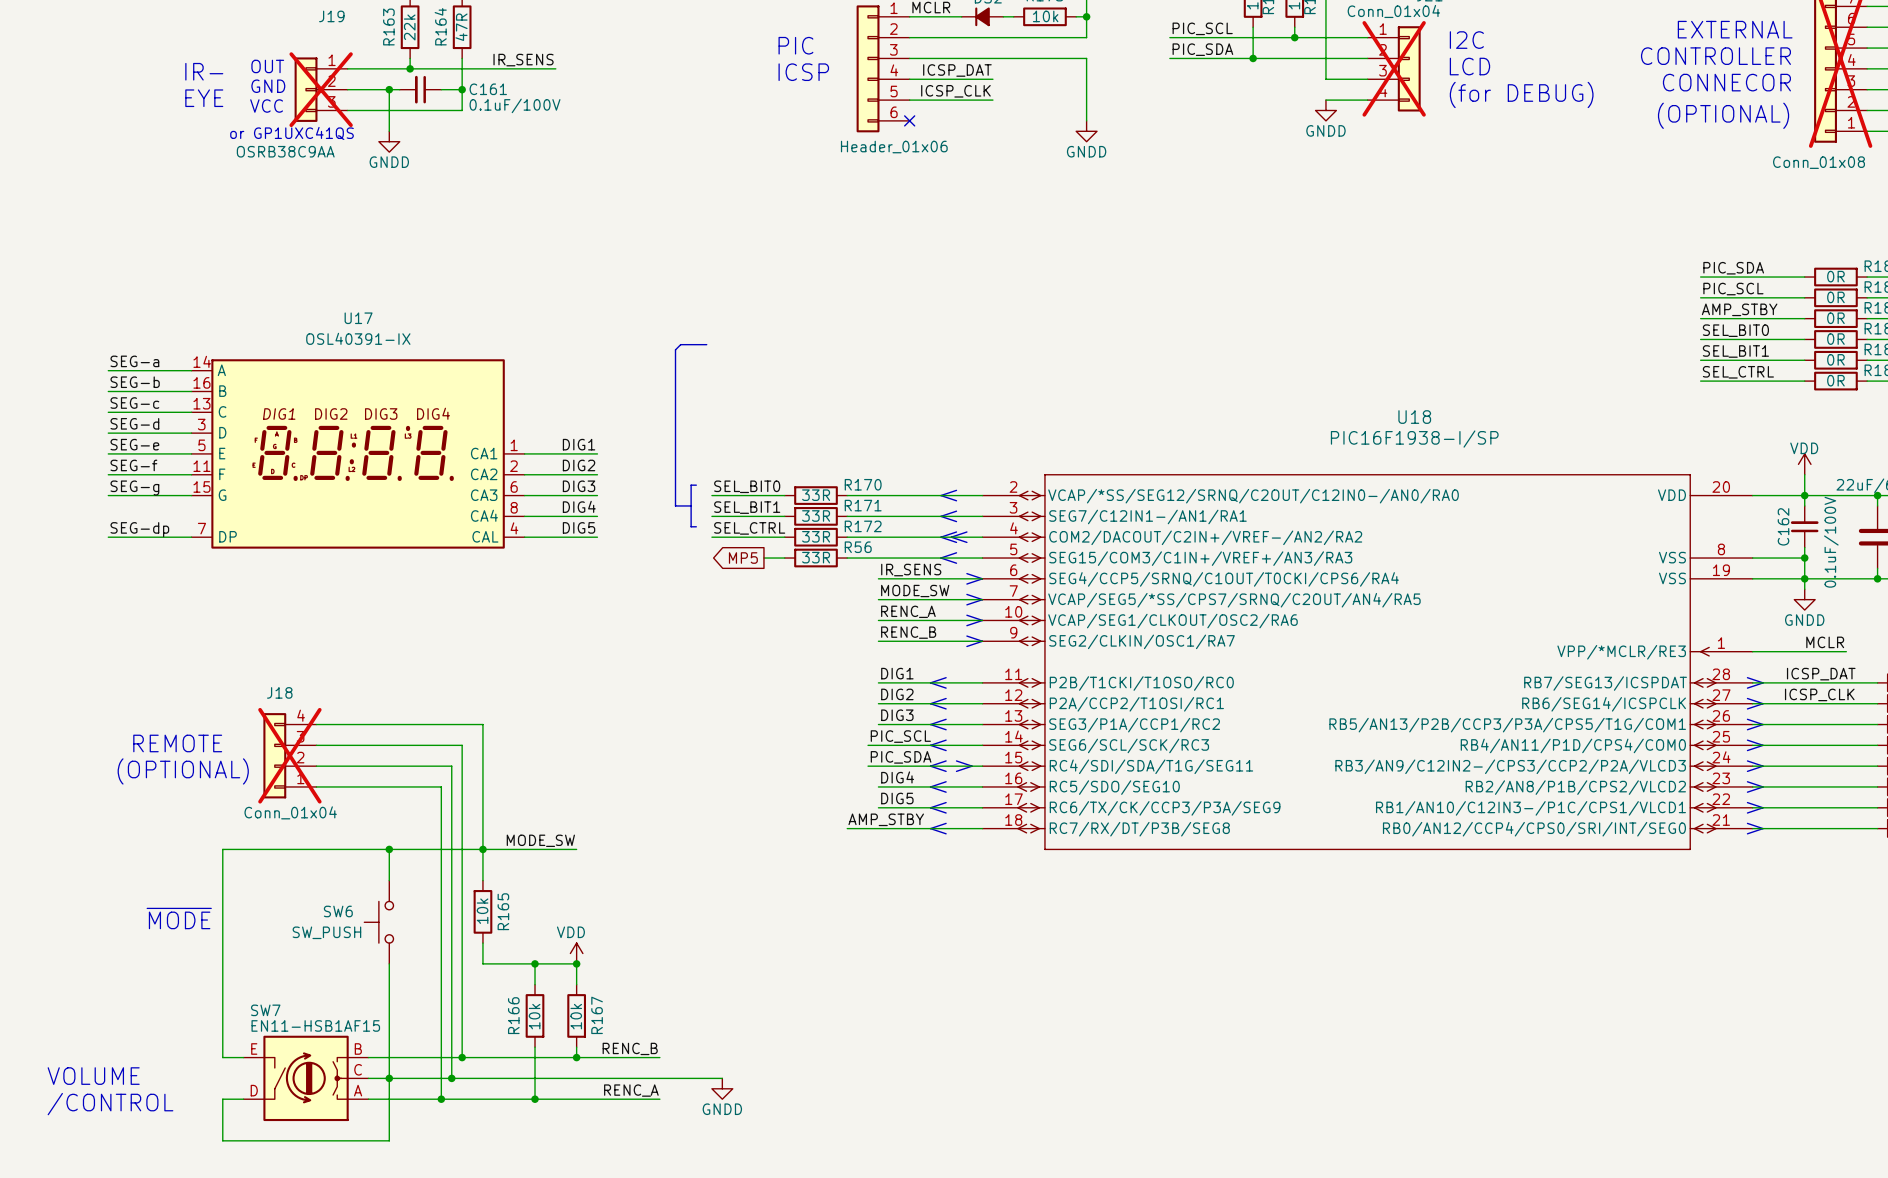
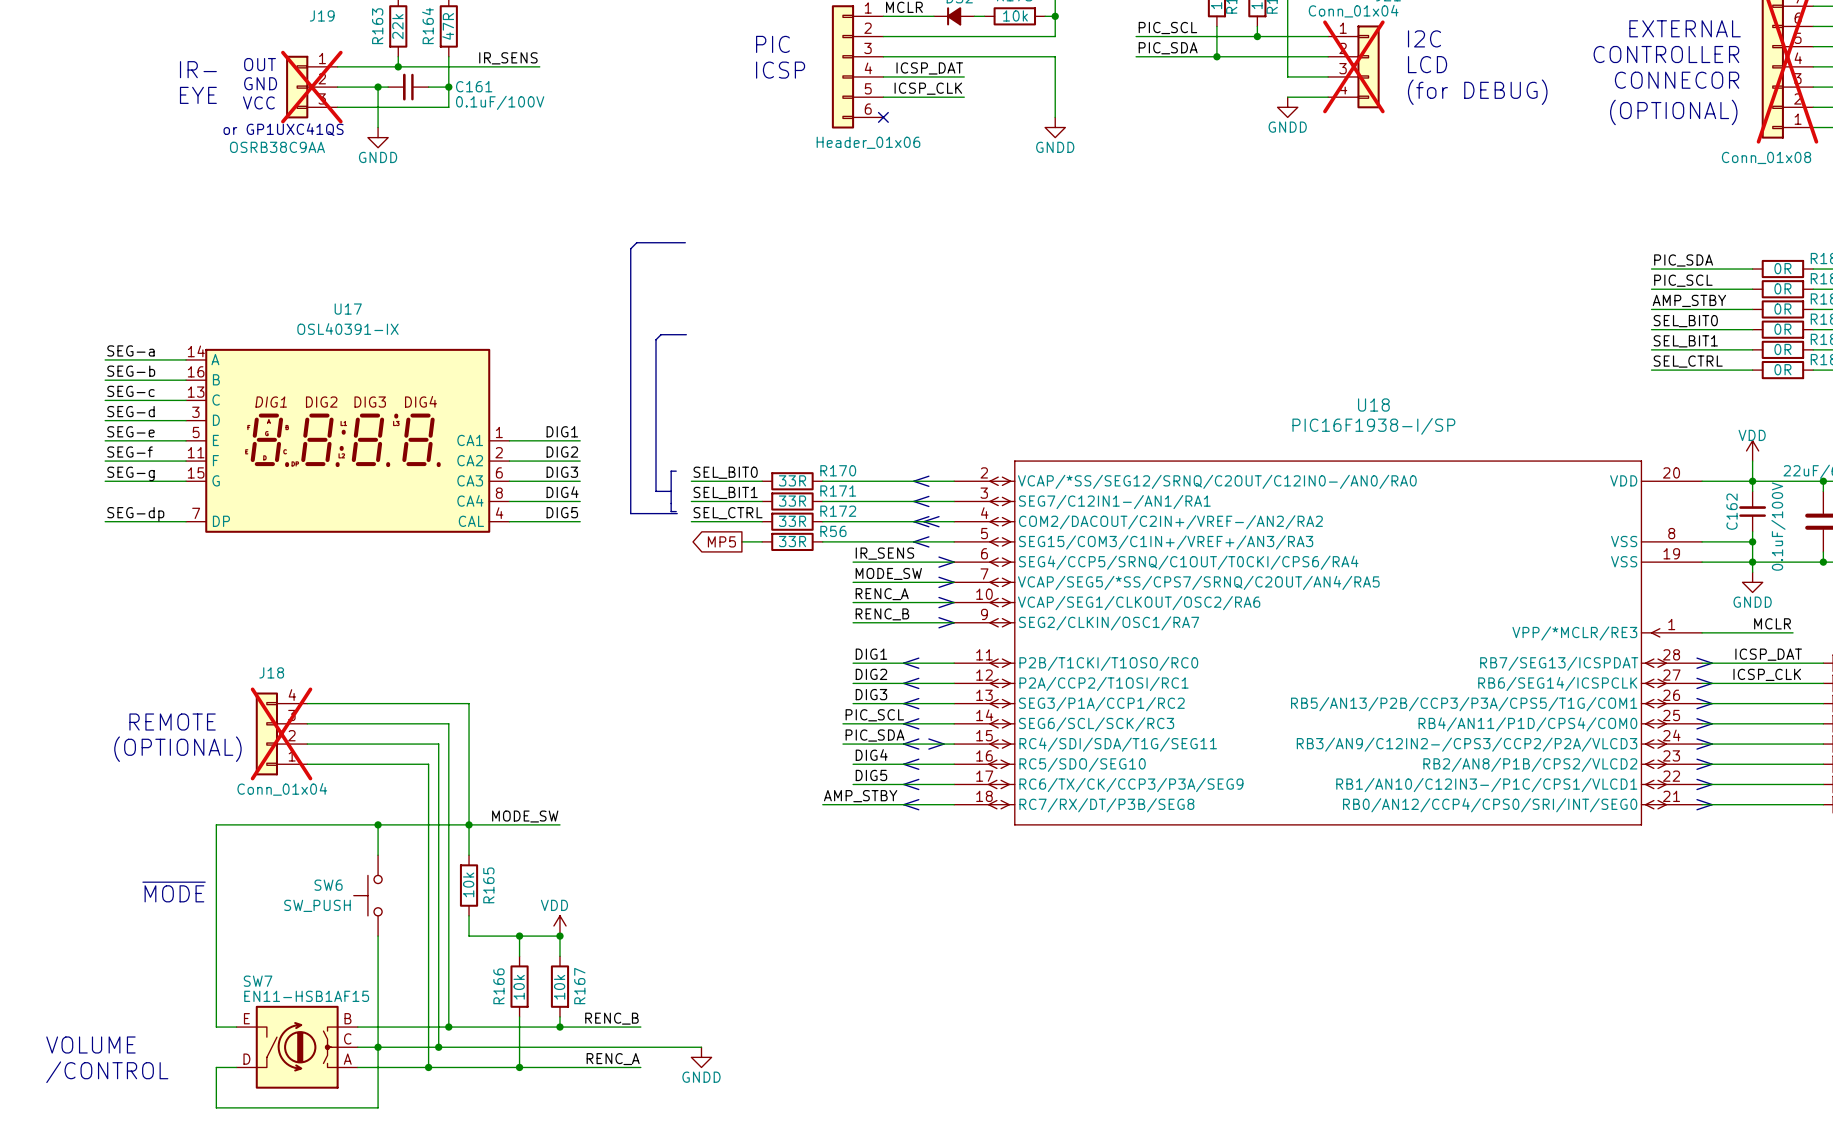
line: none -> (685, 242) (636, 242) (630, 248) (630, 513) (677, 513)

